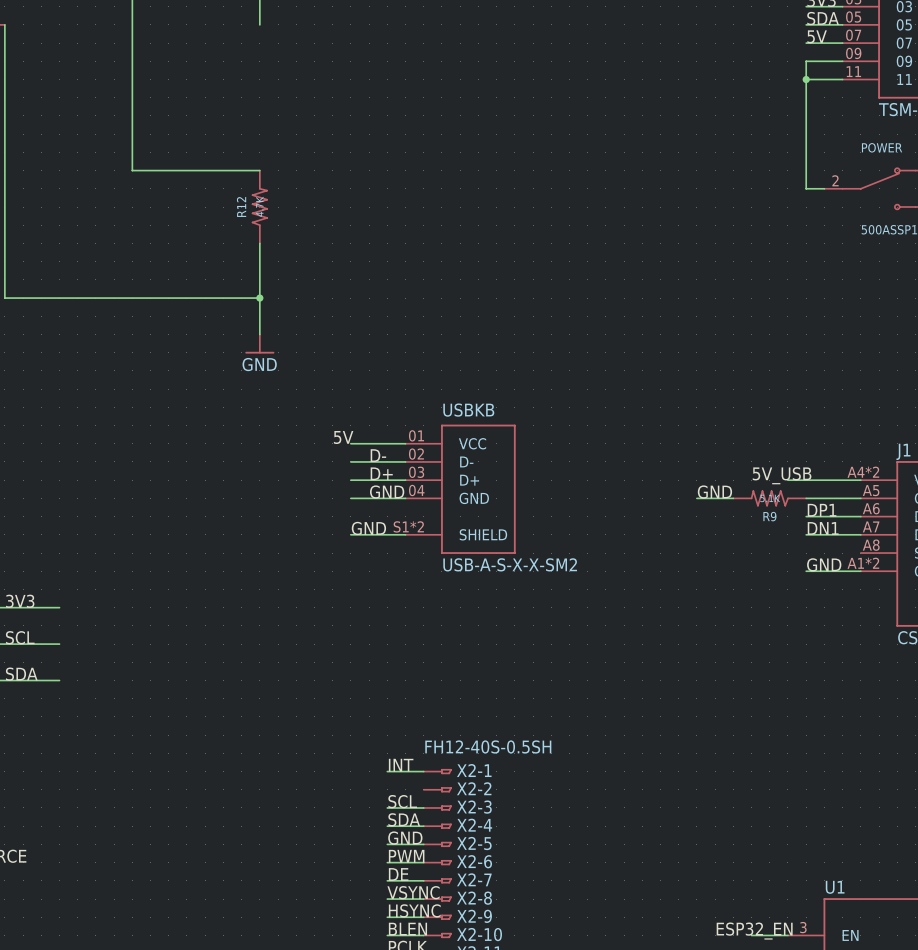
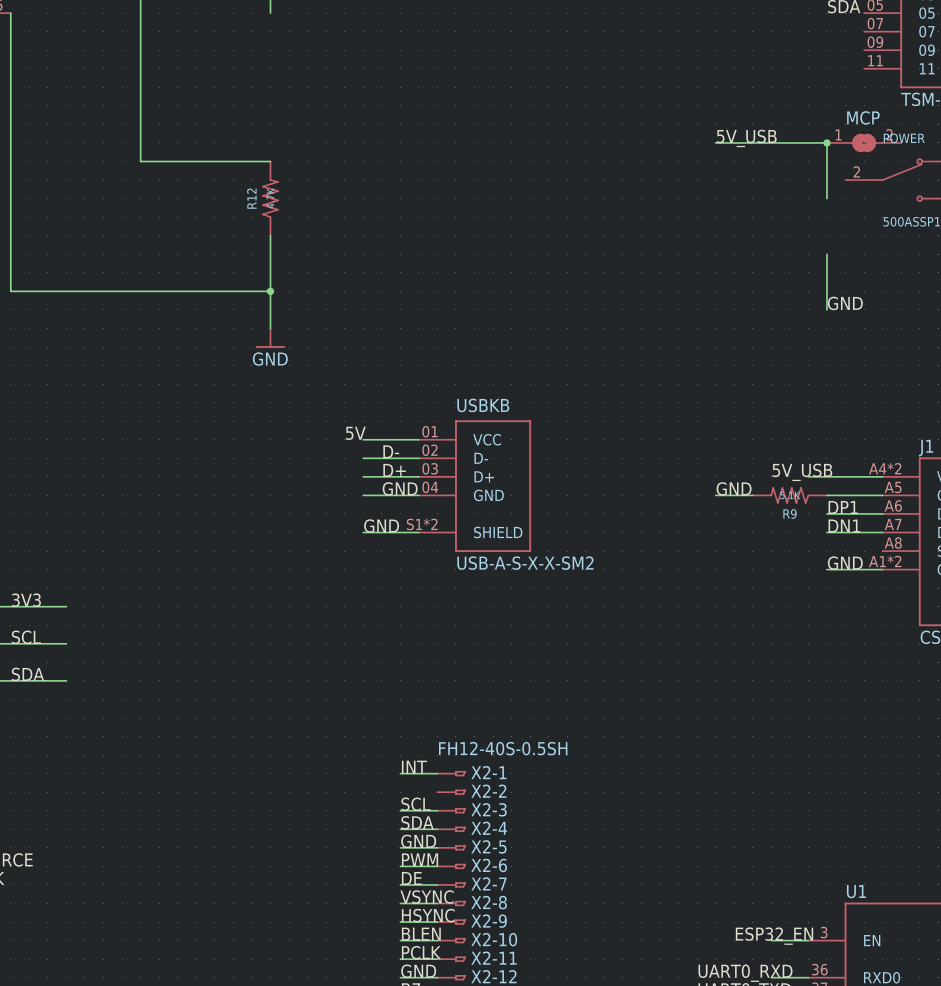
wire: (806, 24) (842, 24) -> none
label: 5V (817, 36) -> none
wire: (806, 43) (842, 43) -> none
wire: (842, 61) (806, 61) (806, 152) -> (715, 142) (826, 142)
wire: (806, 79) (842, 79) -> none
junction: (806, 79) -> none
label: none -> 5V_USB (746, 138)
junction: none -> (826, 142)
MCP: none -> (864, 142)
wire: (806, 188) (824, 188) -> (826, 180) (826, 198)
wire: none -> (826, 254) (826, 309)
label: none -> GND (845, 303)

